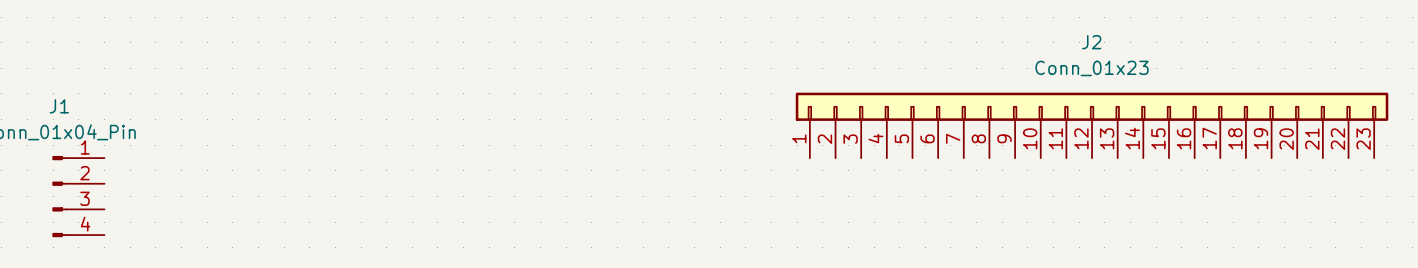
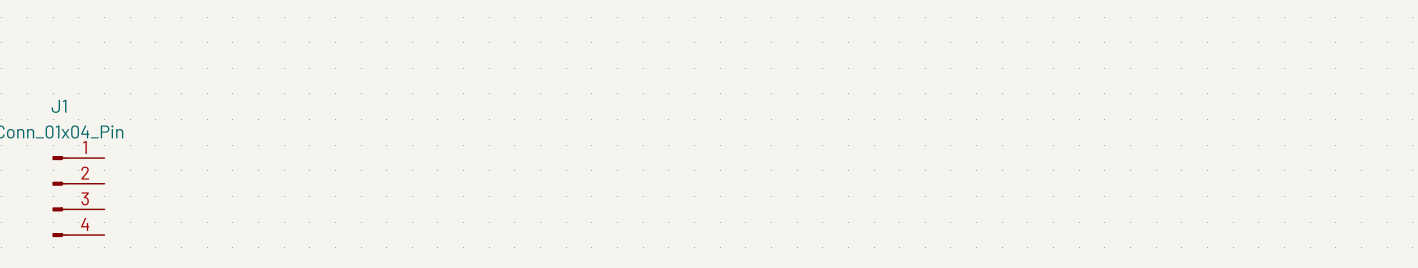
J2: Conn_01x23 (1092, 125) -> none

